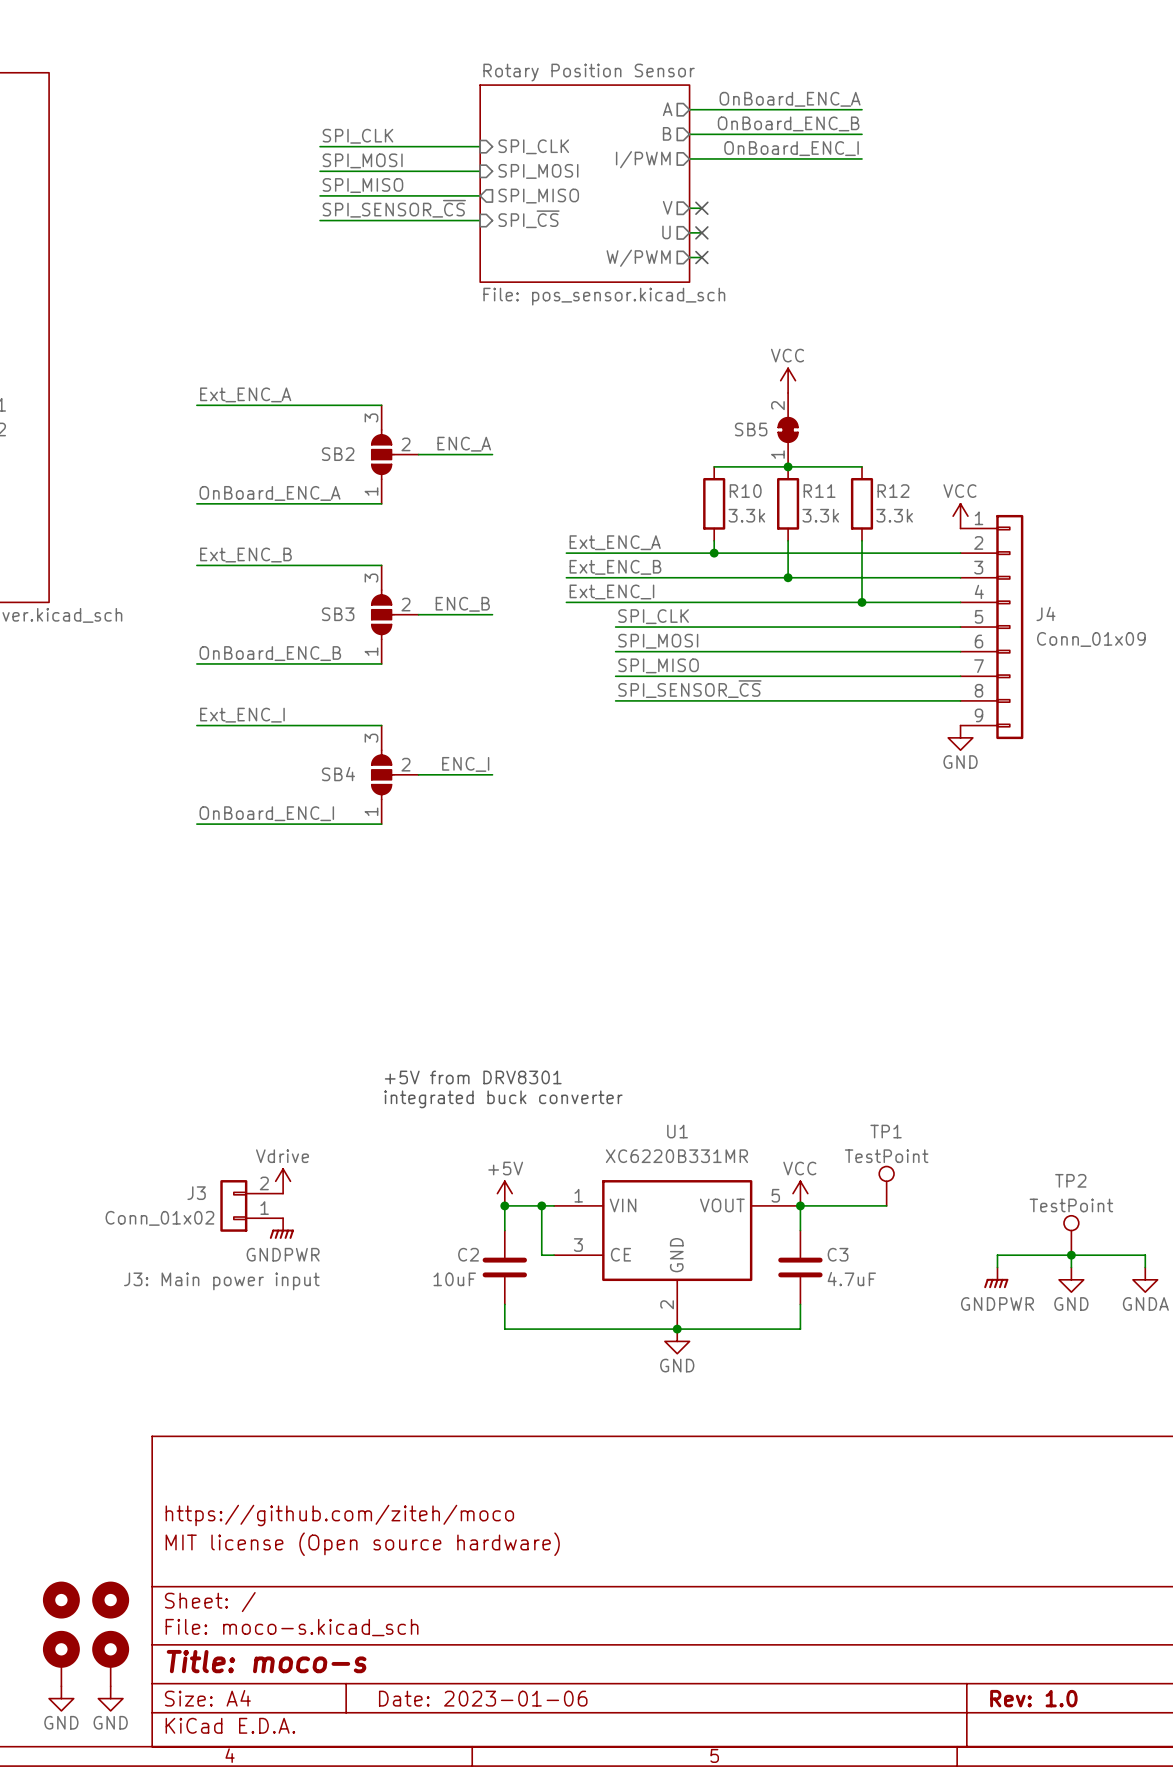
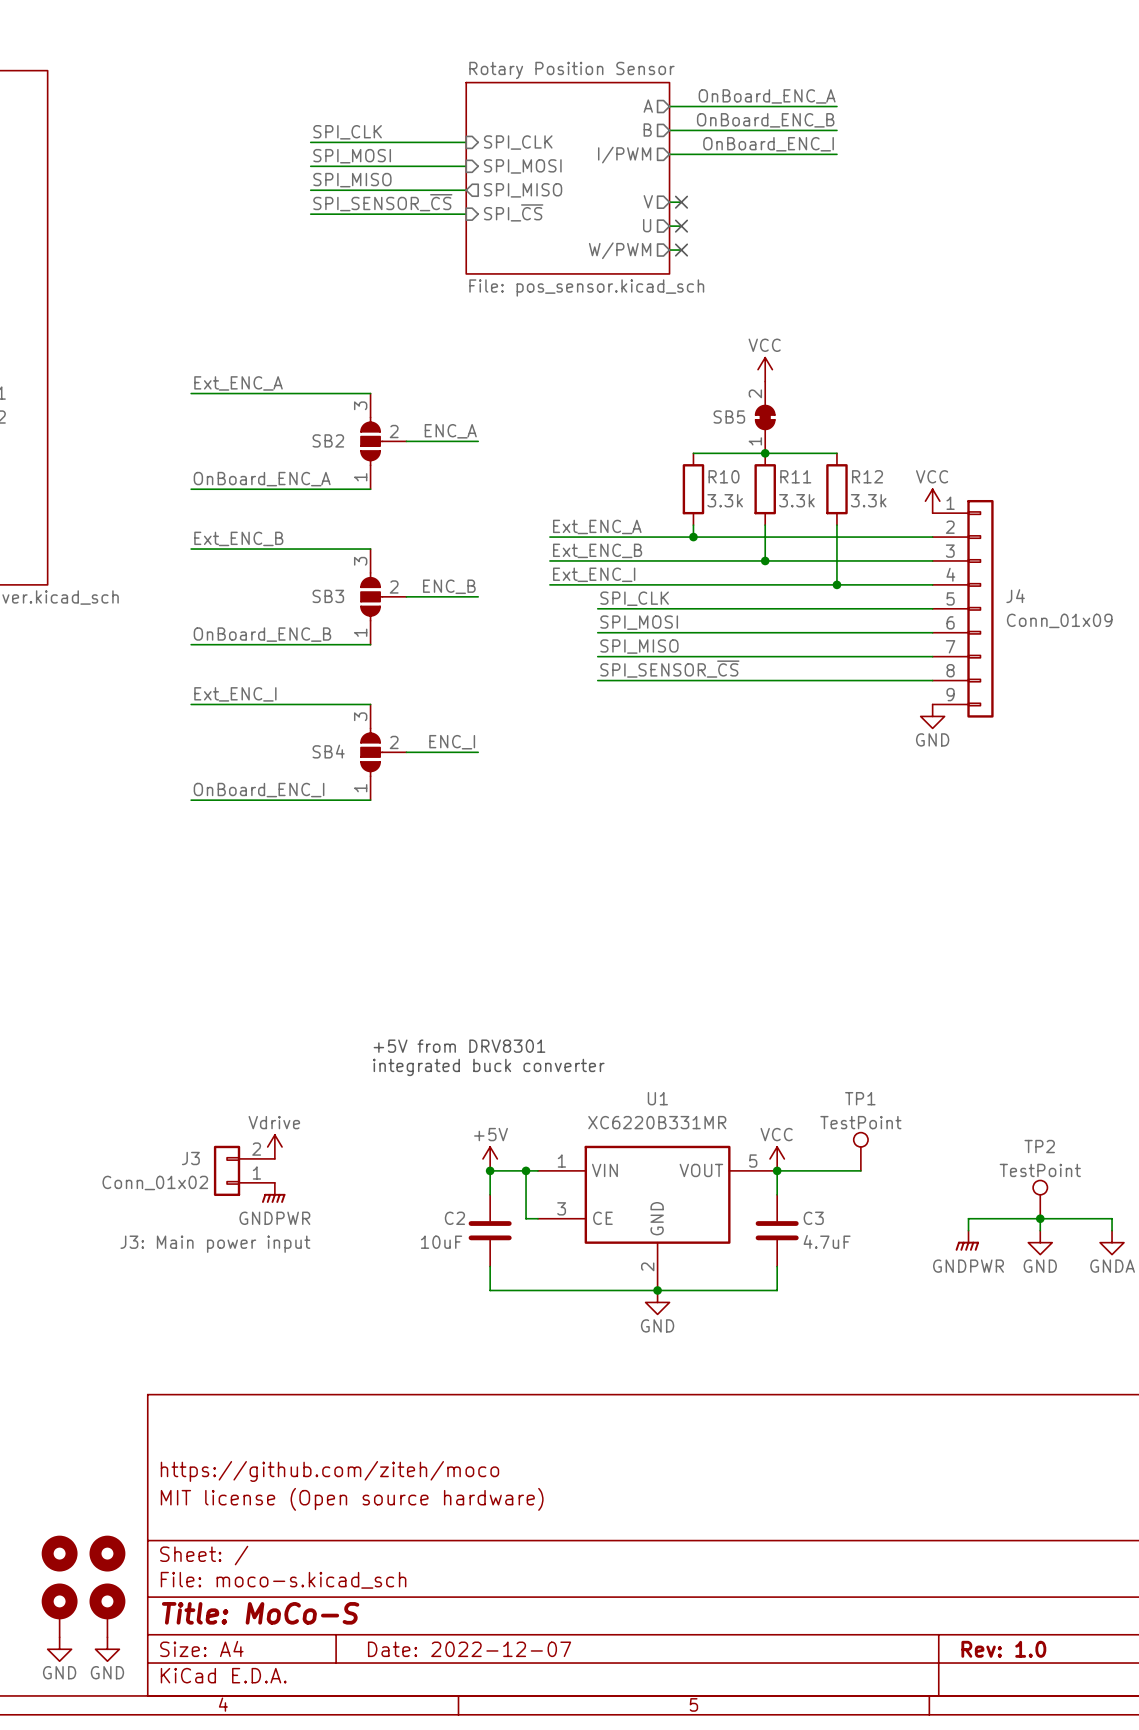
title block: Title: moco-s (266, 1661) -> Title: MoCo-S (260, 1613)
title block: Date: 2023-01-06 (483, 1698) -> Date: 2022-12-07 (469, 1649)

